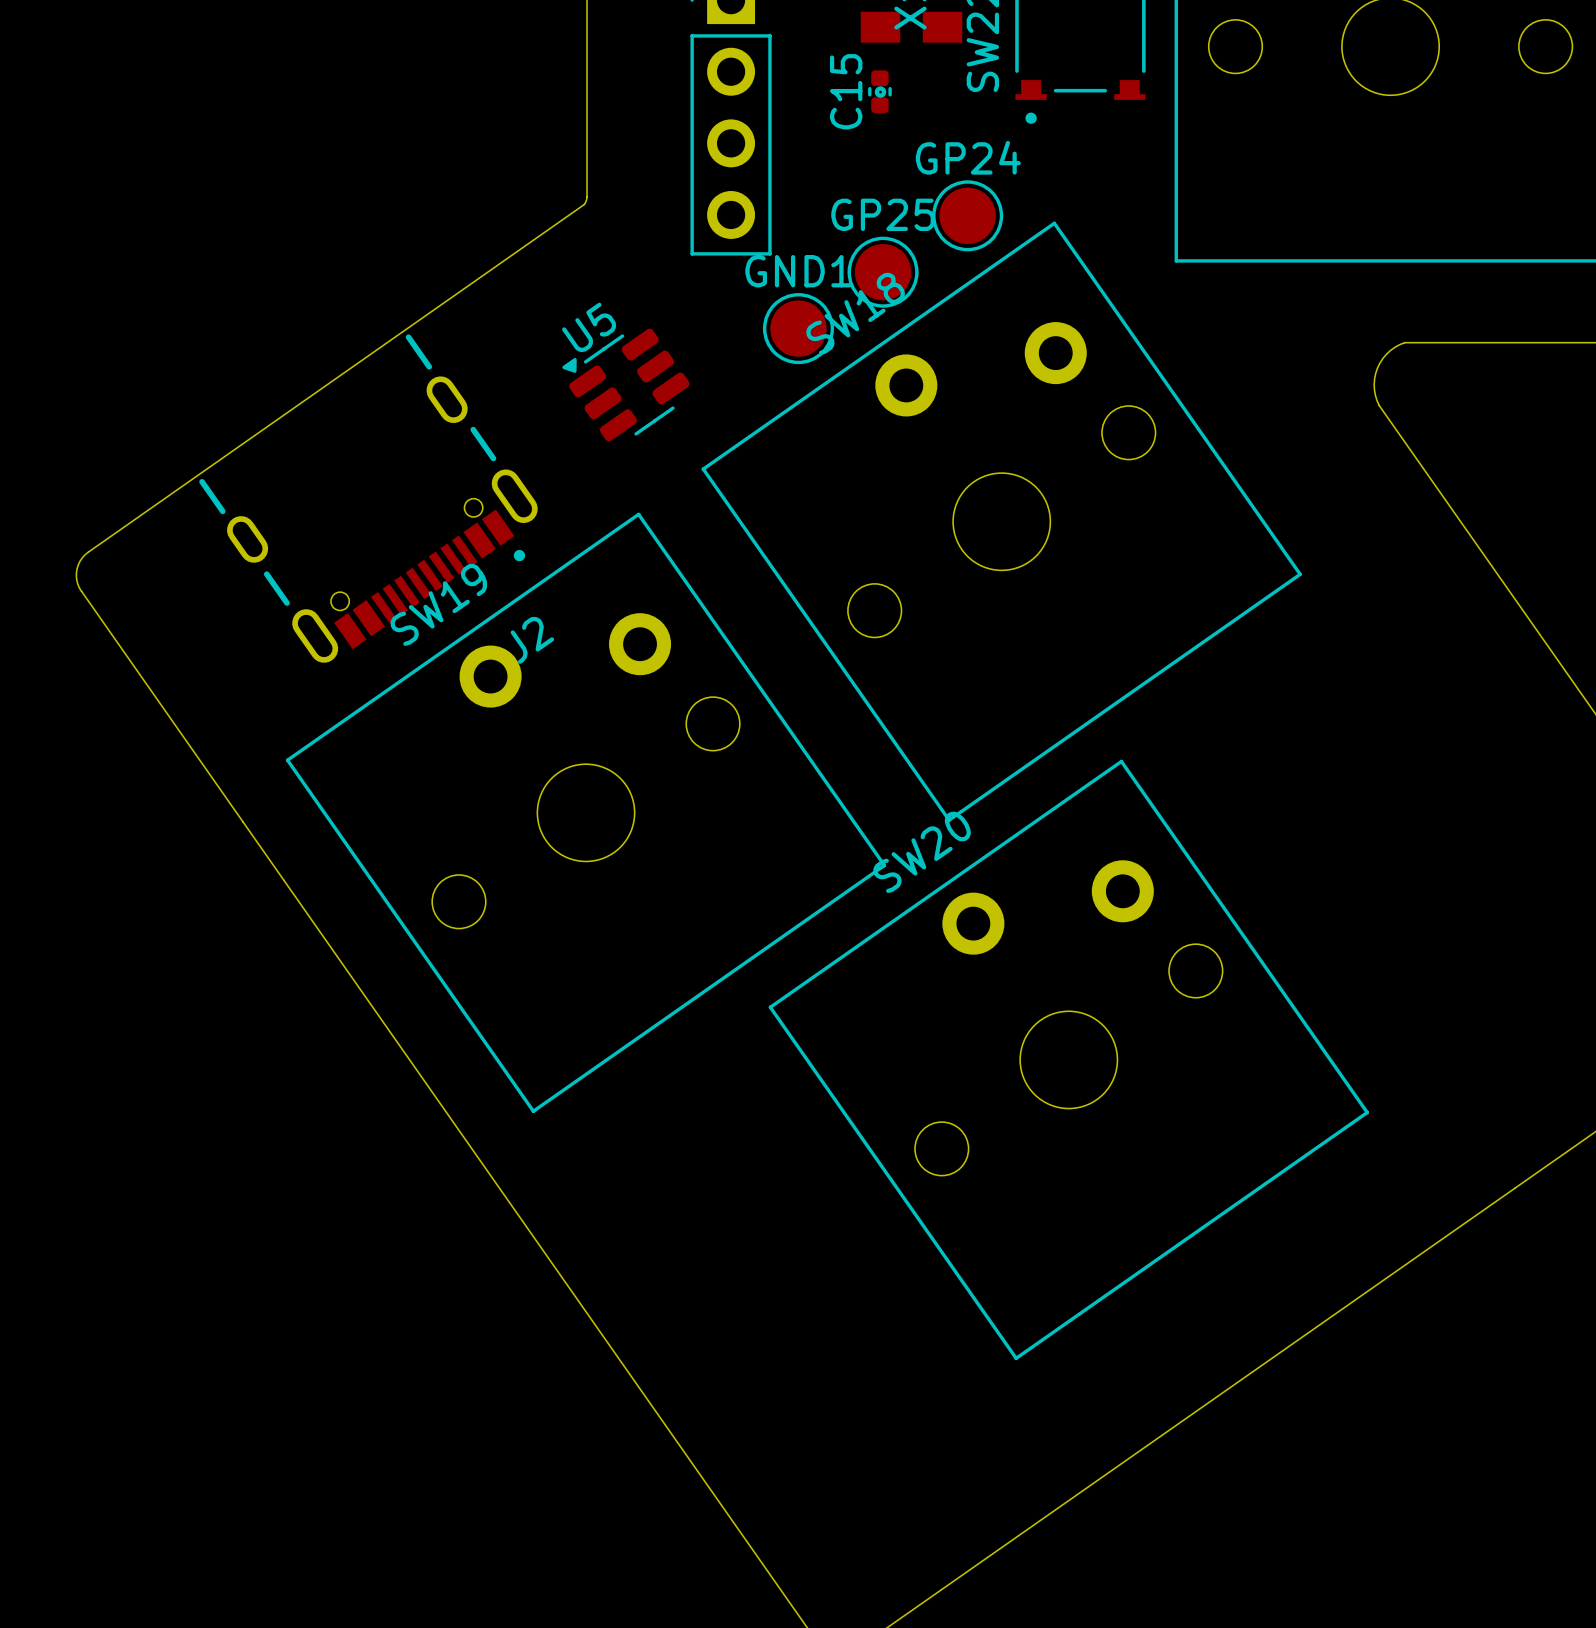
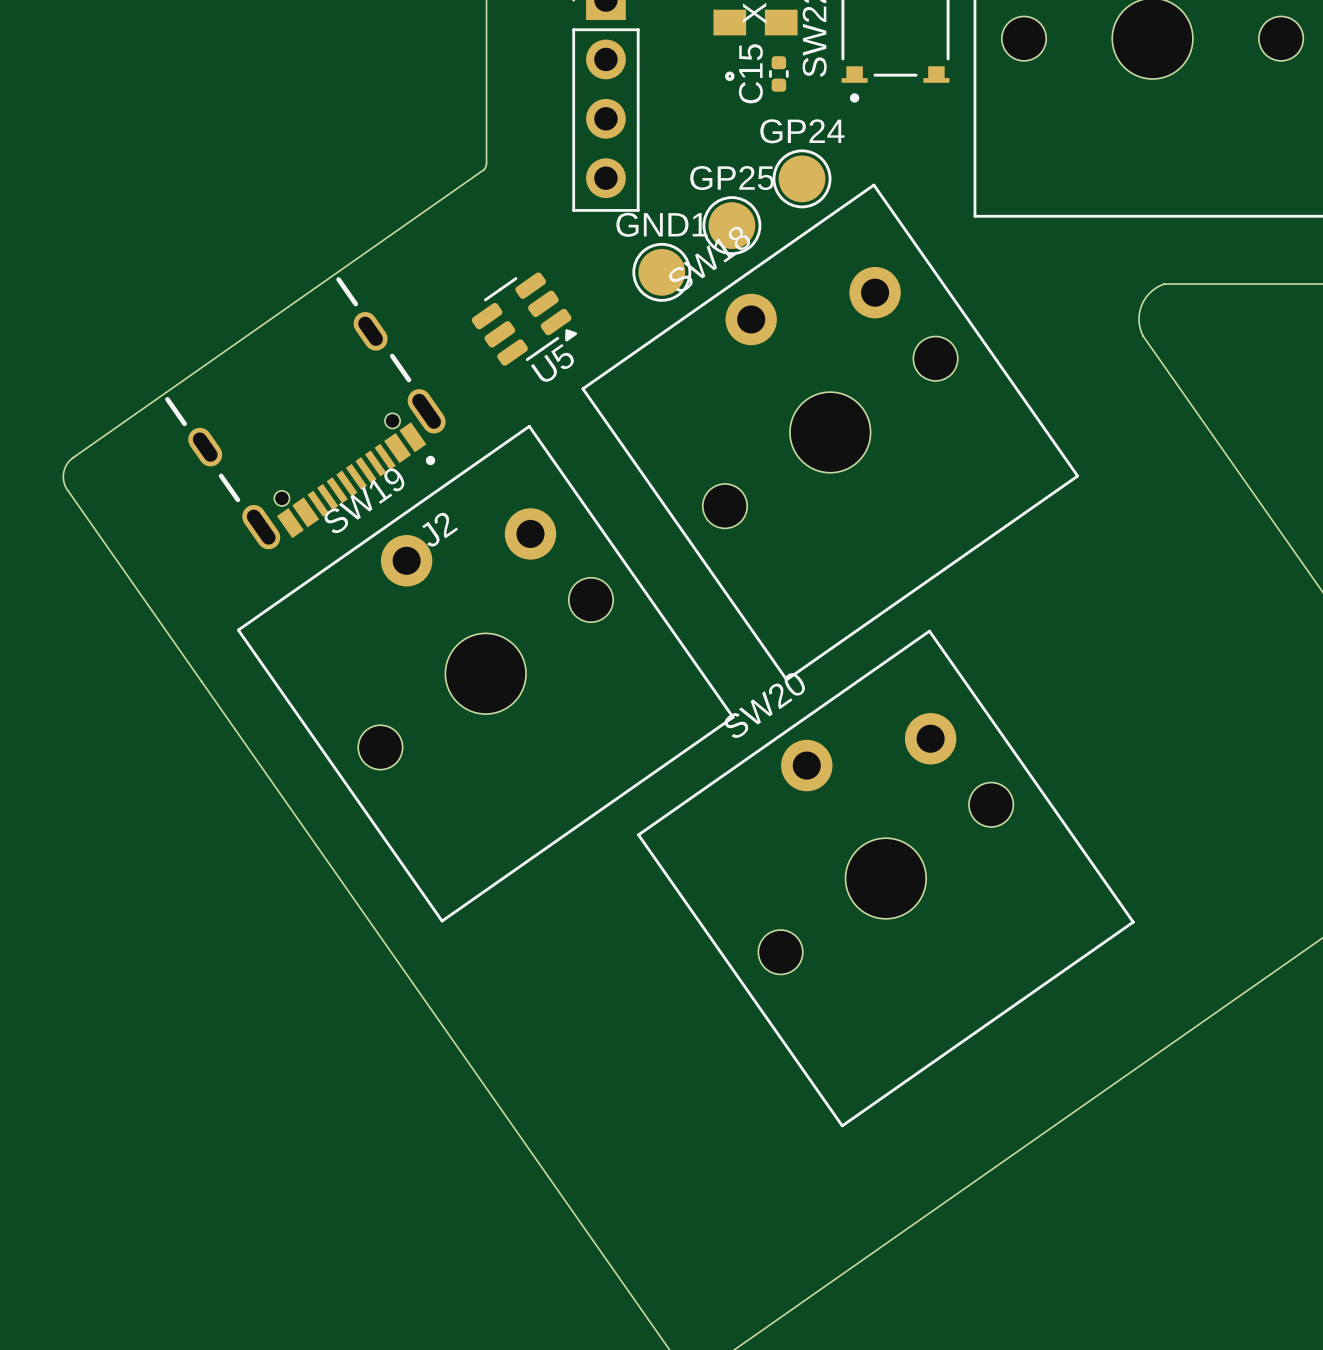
C15 position: (879, 91) -> (778, 73)
U5 rotation: 0° (625, 384) -> 180° (524, 319)

